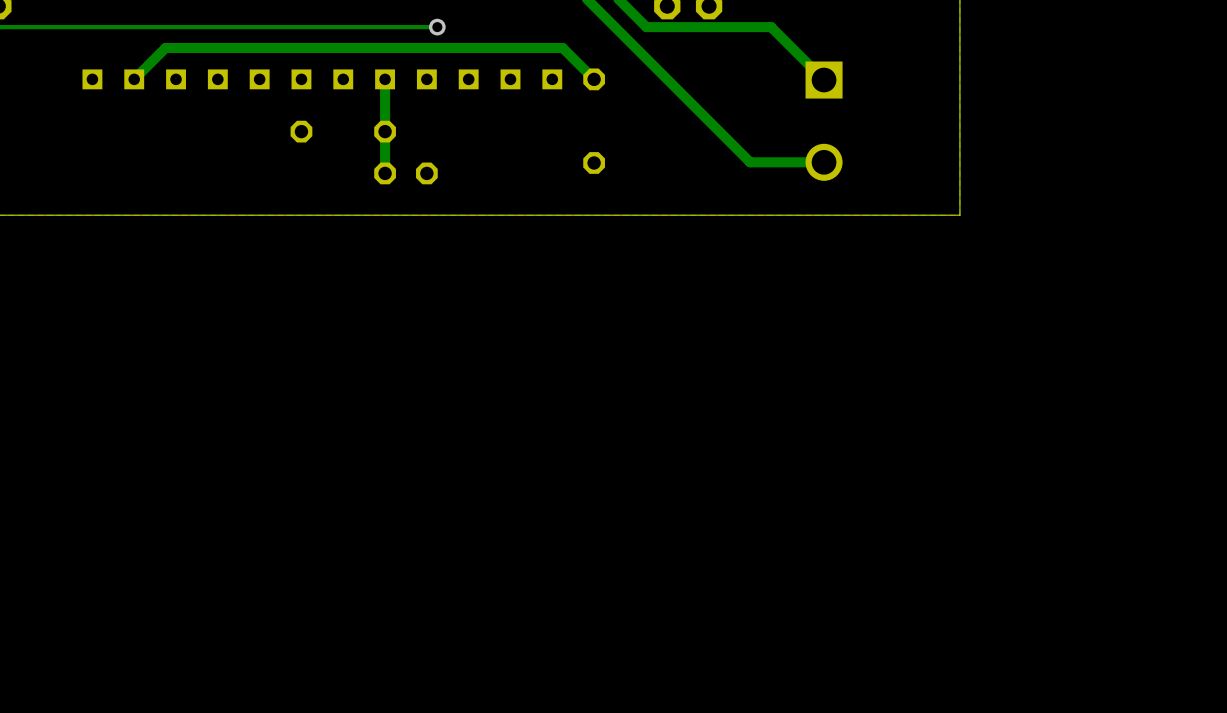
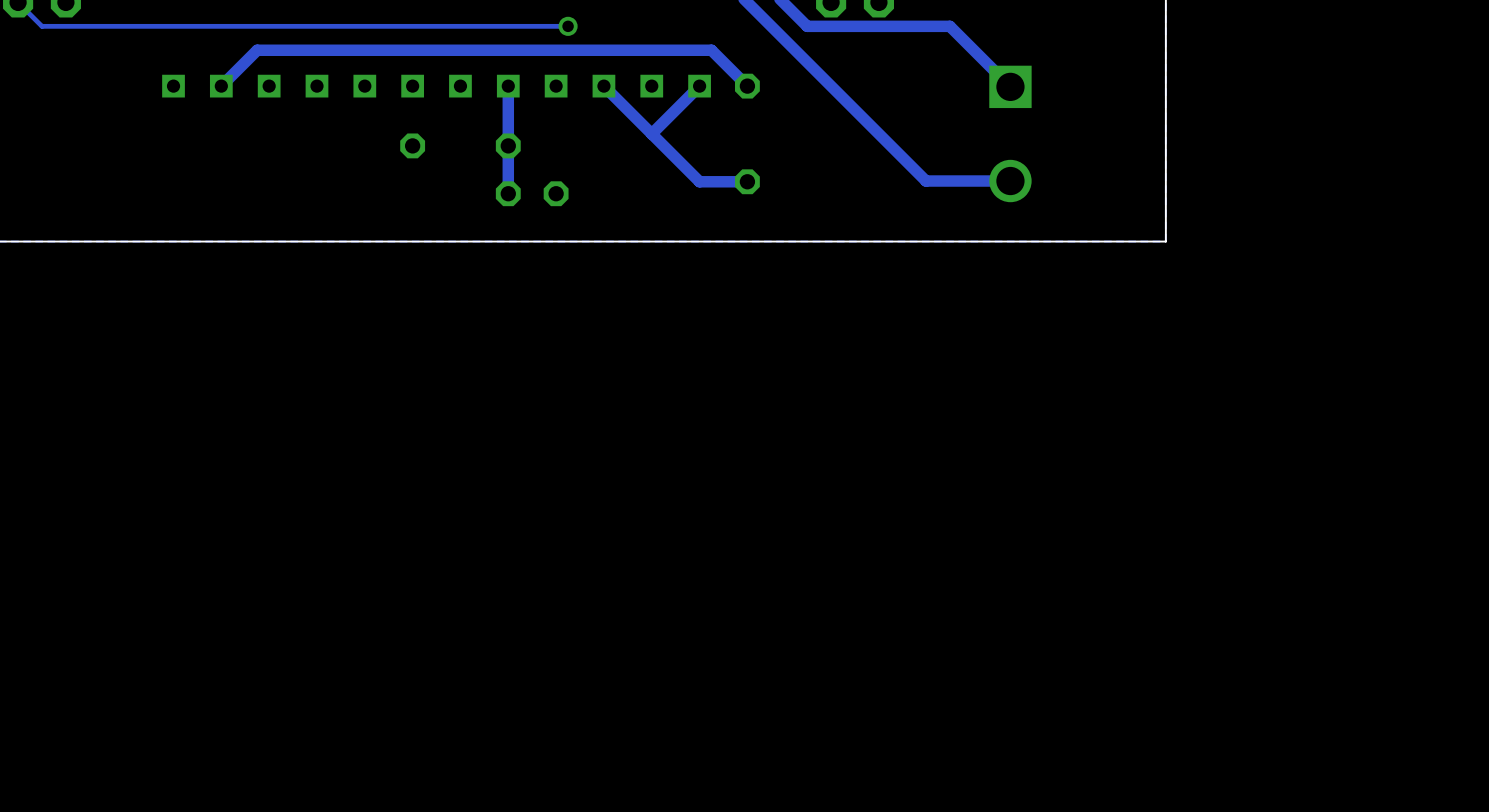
track: none -> (603, 86) (699, 181) (747, 181)
track: none -> (699, 86) (651, 133)

